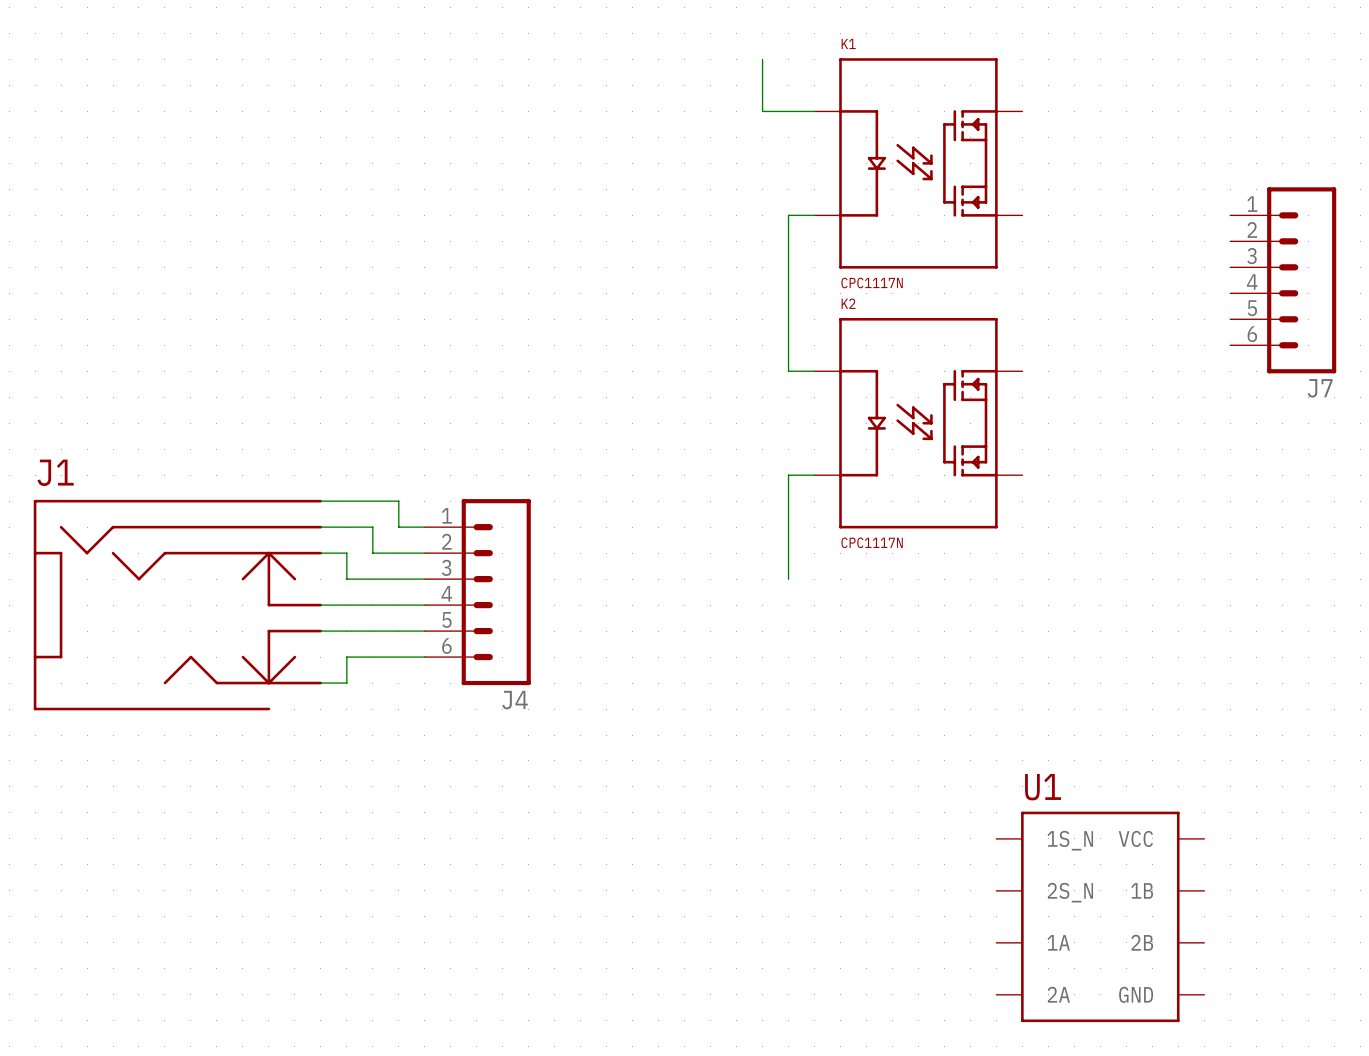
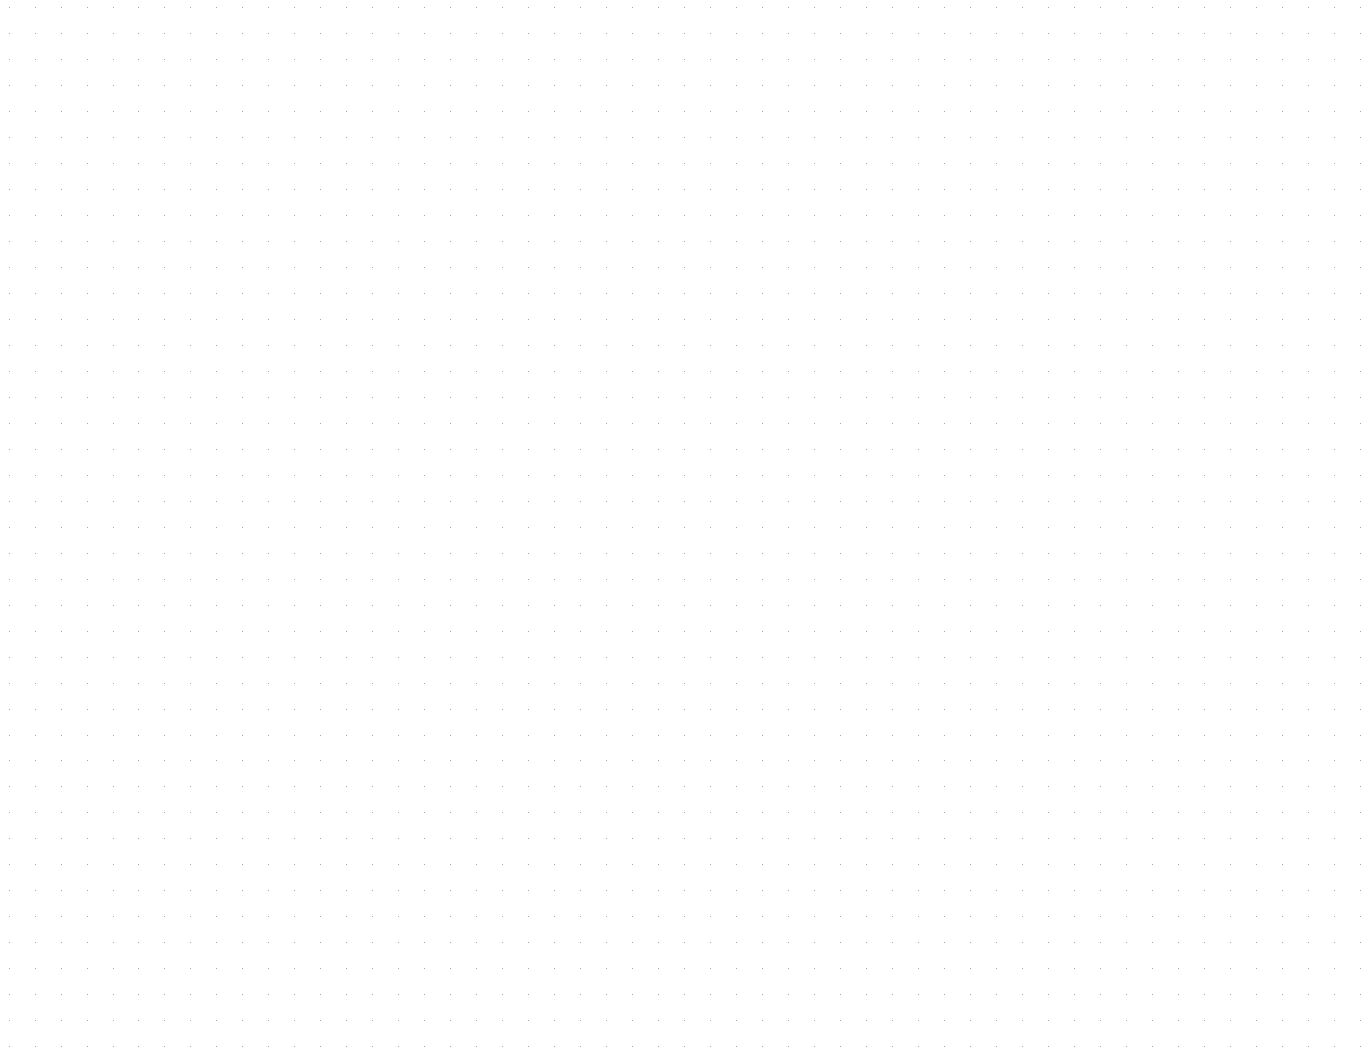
wire: (762, 59) (762, 111) (814, 111) -> none
K1: CPC1117N (918, 163) -> none
wire: (814, 215) (788, 215) (788, 371) (814, 371) -> none
J7: (1283, 280) -> none
K2: CPC1117N (918, 423) -> none
wire: (814, 475) (788, 475) (788, 579) -> none
wire: (320, 501) (398, 501) (398, 527) (424, 527) -> none
wire: (320, 527) (372, 527) (372, 553) (424, 553) -> none
wire: (320, 553) (346, 553) (346, 579) (424, 579) -> none
J4: (477, 592) -> none
J1: (177, 605) -> none
wire: (320, 605) (424, 605) -> none
wire: (320, 631) (424, 631) -> none
wire: (424, 657) (346, 657) (346, 683) (320, 683) -> none
U1: (1100, 916) -> none

